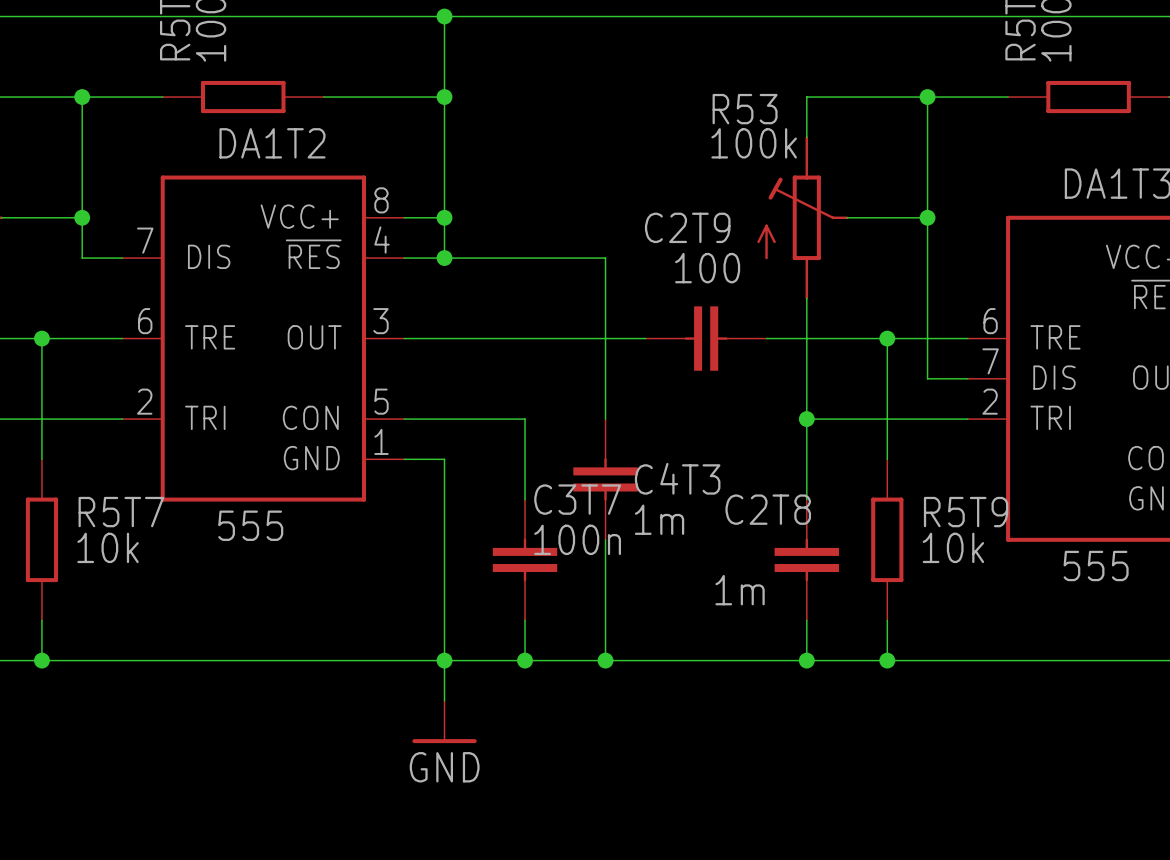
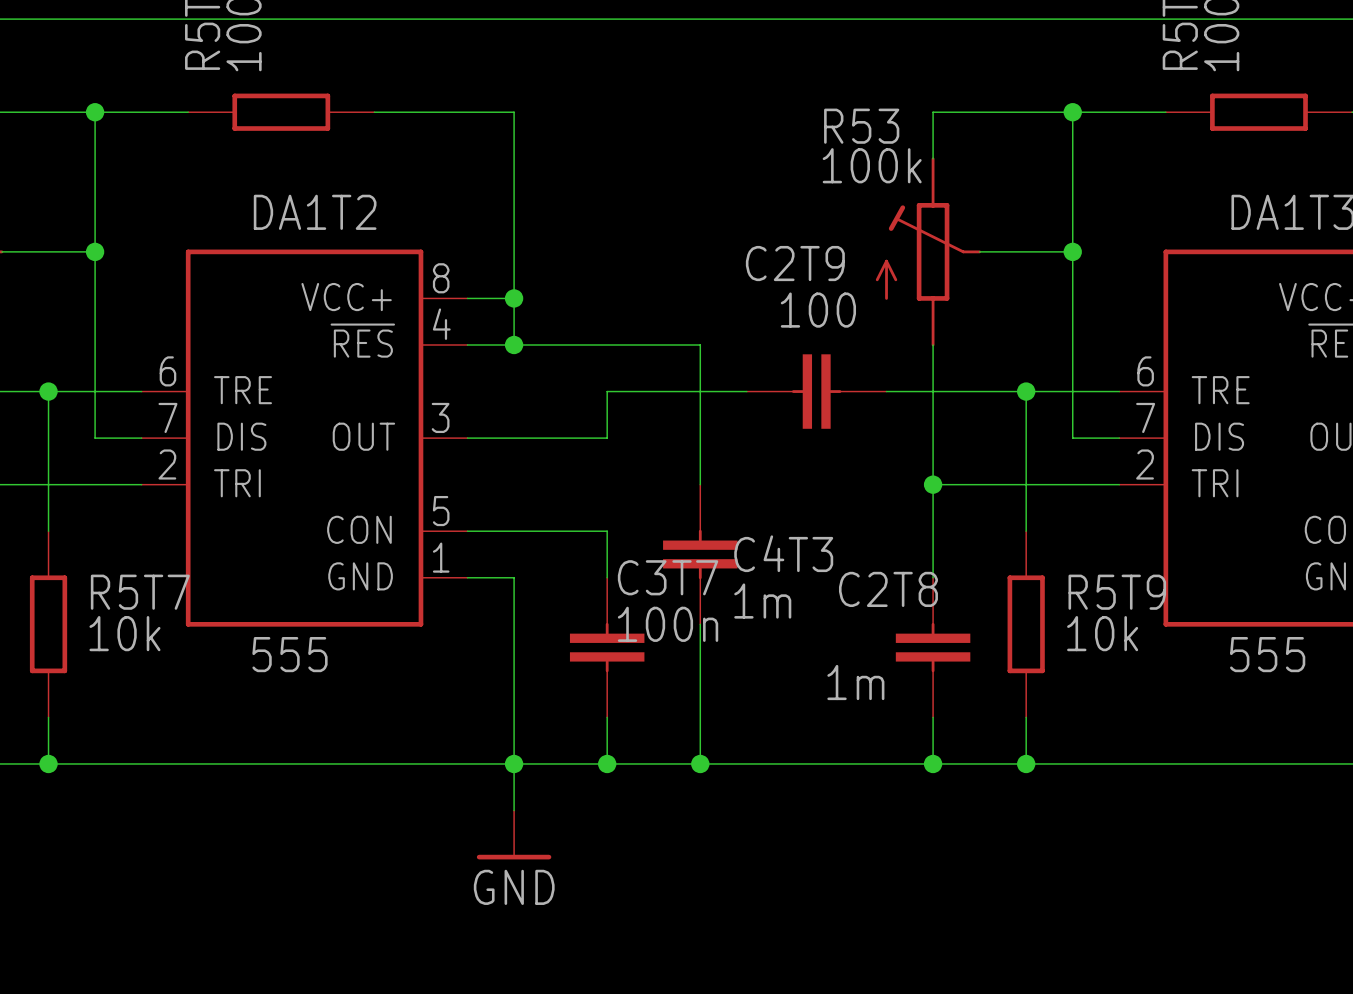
wire: (444, 16) (444, 97) -> none
junction: (444, 16) -> none
junction: (444, 97) -> none
DA1T2 symbol: [122, 175, 405, 502] -> [141, 249, 468, 627]
wire: (404, 217) (444, 217) -> none
junction position: (444, 217) -> (514, 344)
wire: (82, 258) (122, 258) -> (95, 298) (95, 438) (141, 438)
wire: (444, 258) (605, 258) (605, 298) -> (467, 344) (700, 344)
wire: none -> (514, 298) (514, 344)
wire: (404, 338) (525, 338) -> (467, 438) (607, 438) (607, 391)
wire: (404, 419) (525, 419) (525, 459) -> (514, 531) (607, 531)
wire: (444, 459) (444, 499) -> (467, 577) (514, 577)

